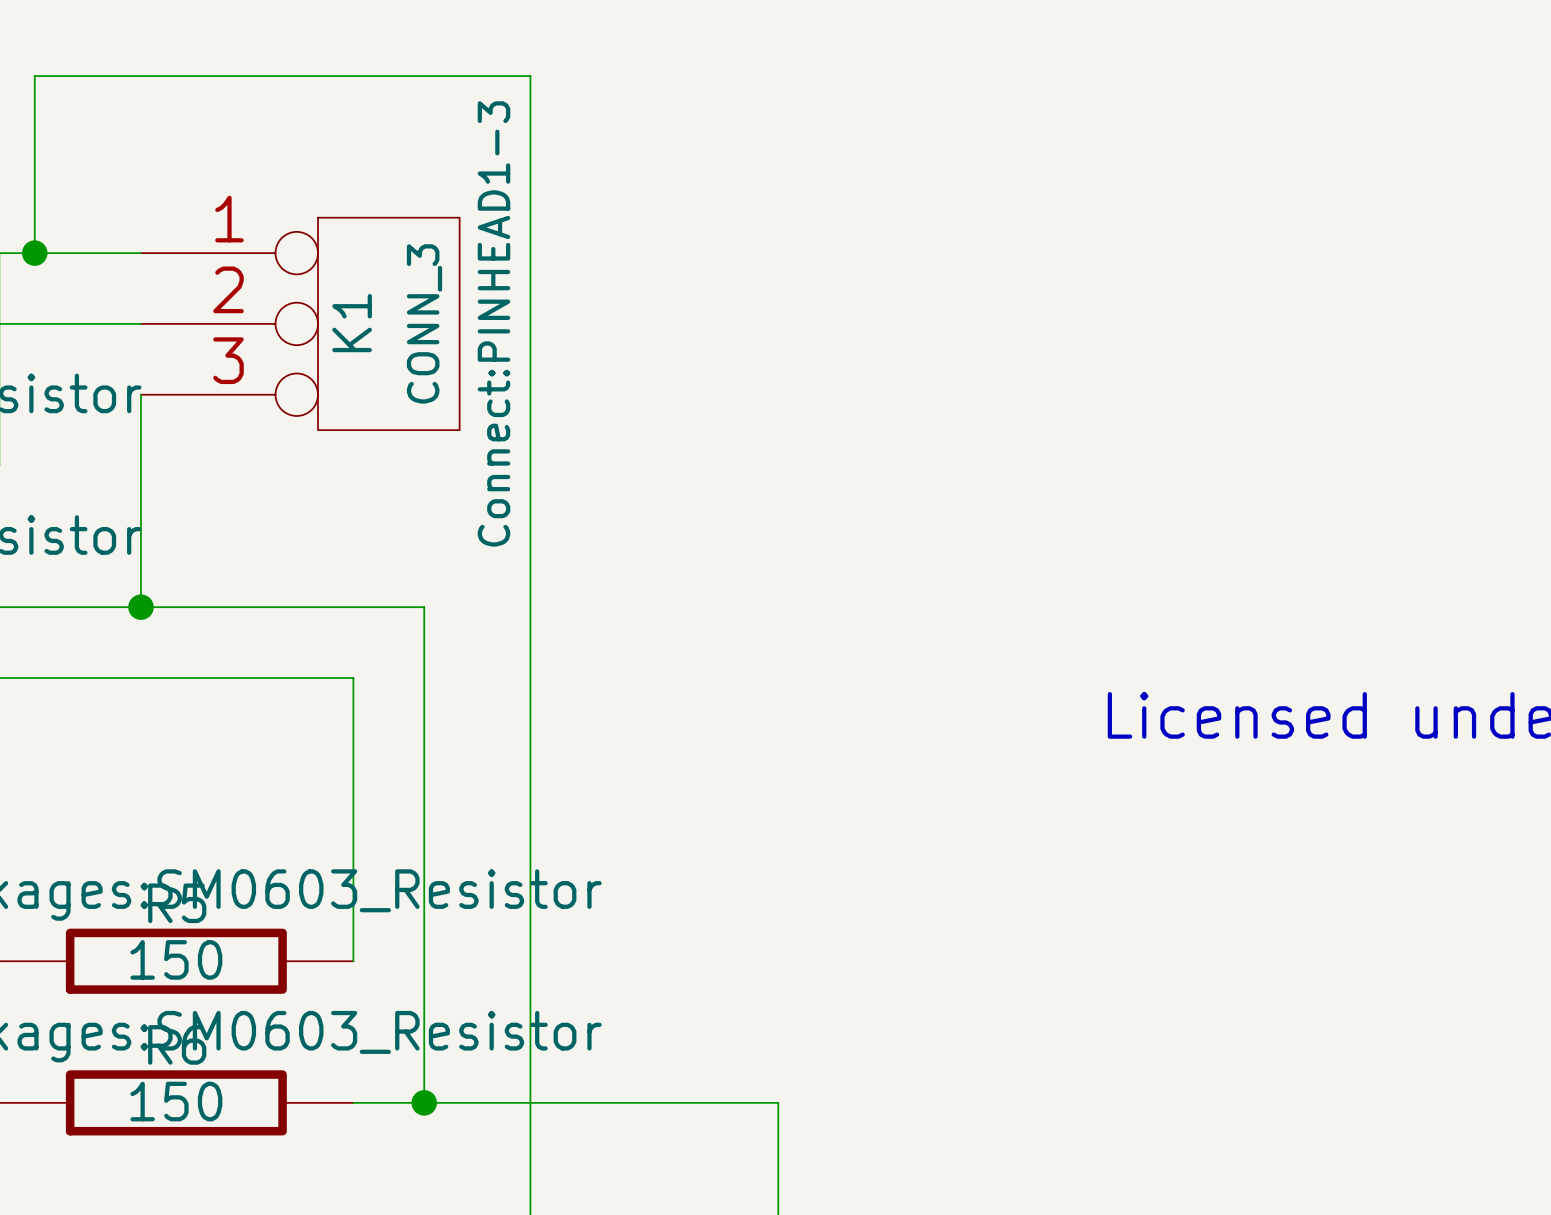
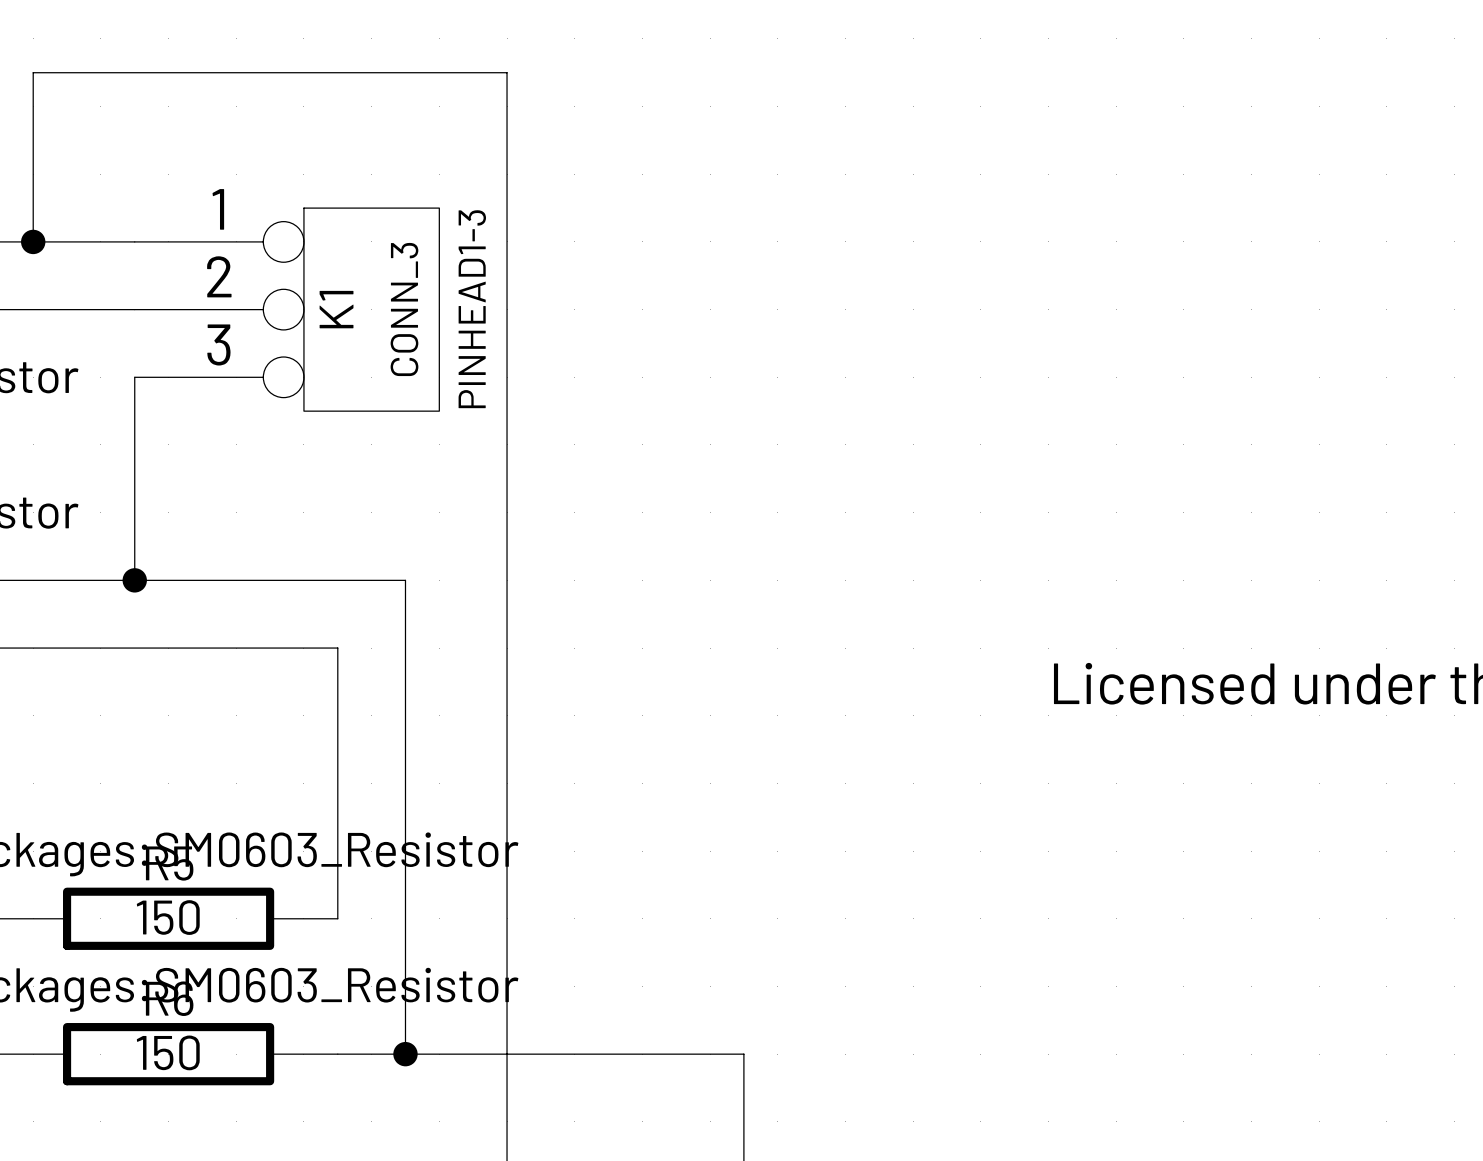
K1 text: Connect:PINHEAD1-3 (493, 323) -> PINHEAD1-3 (472, 309)

